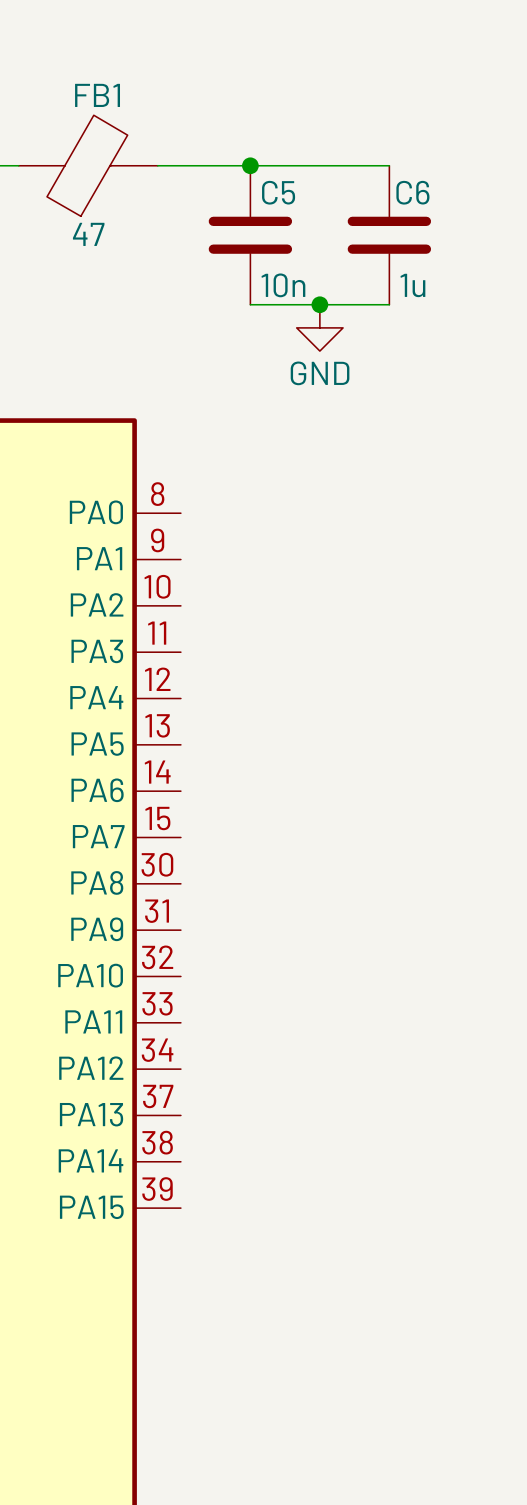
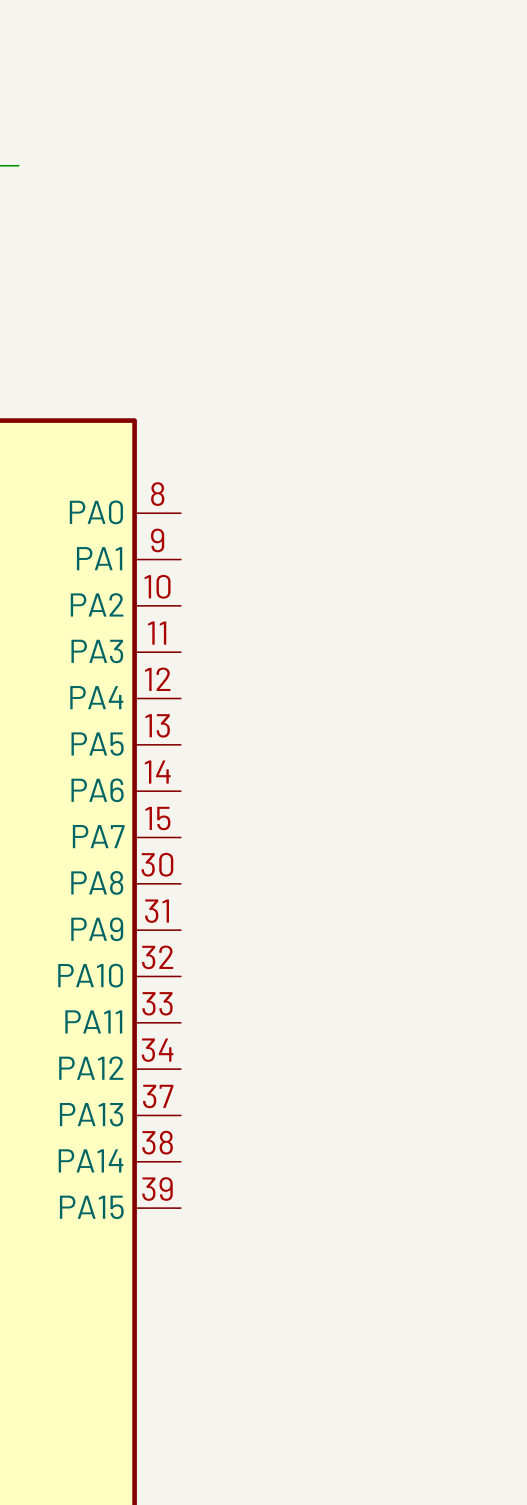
FB1: 47 (88, 165) -> none
wire: (157, 165) (389, 165) -> none
junction: (250, 165) -> none
C5: 10n (250, 235) -> none
C6: 1u (389, 235) -> none
wire: (250, 304) (389, 304) -> none
junction: (319, 304) -> none
power symbol: GND (319, 327) -> none

